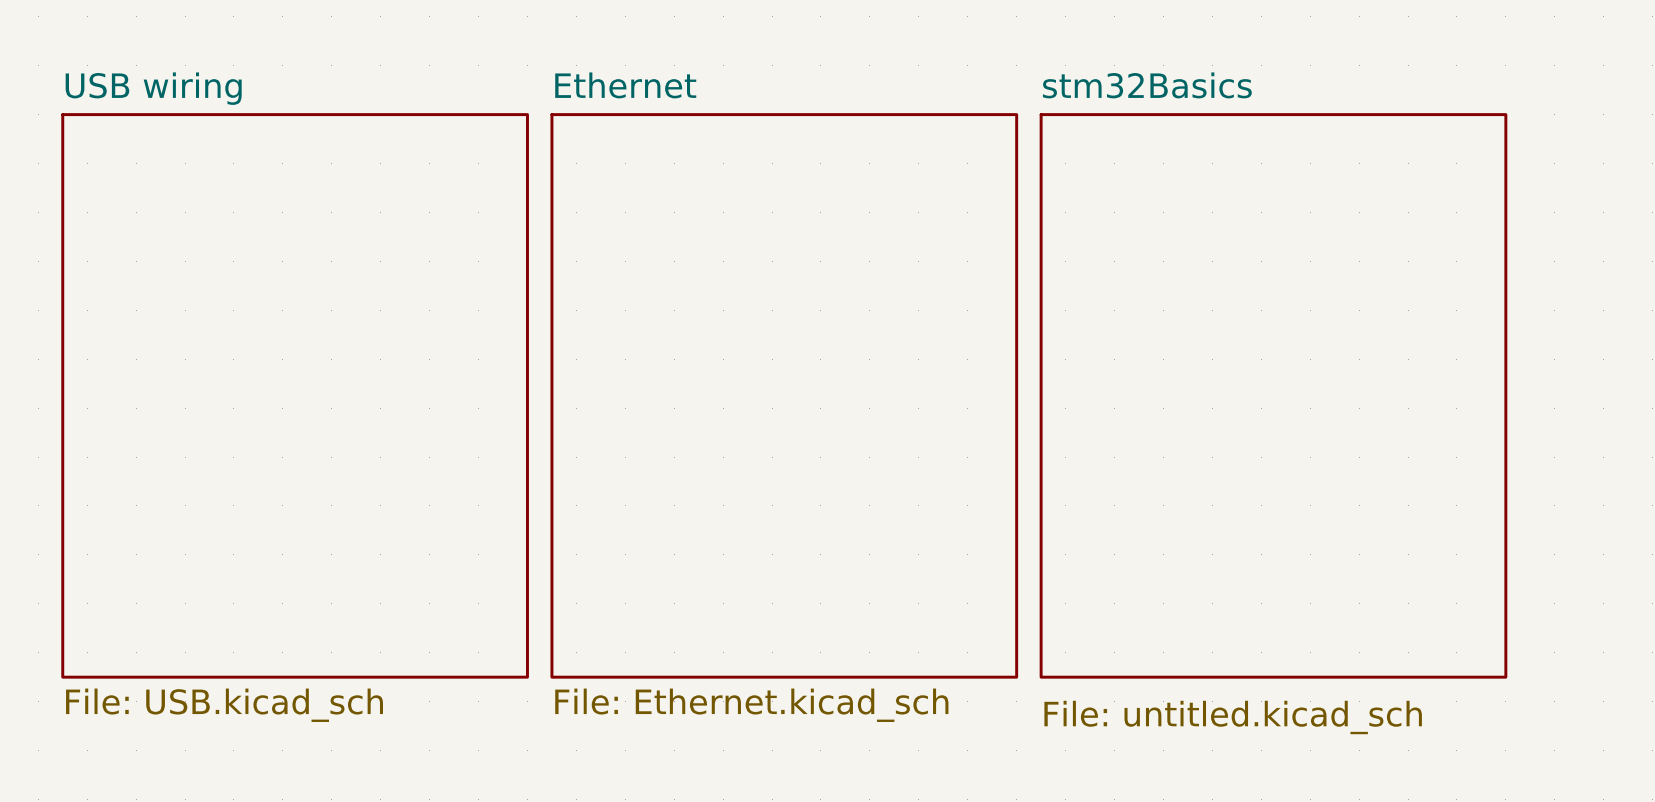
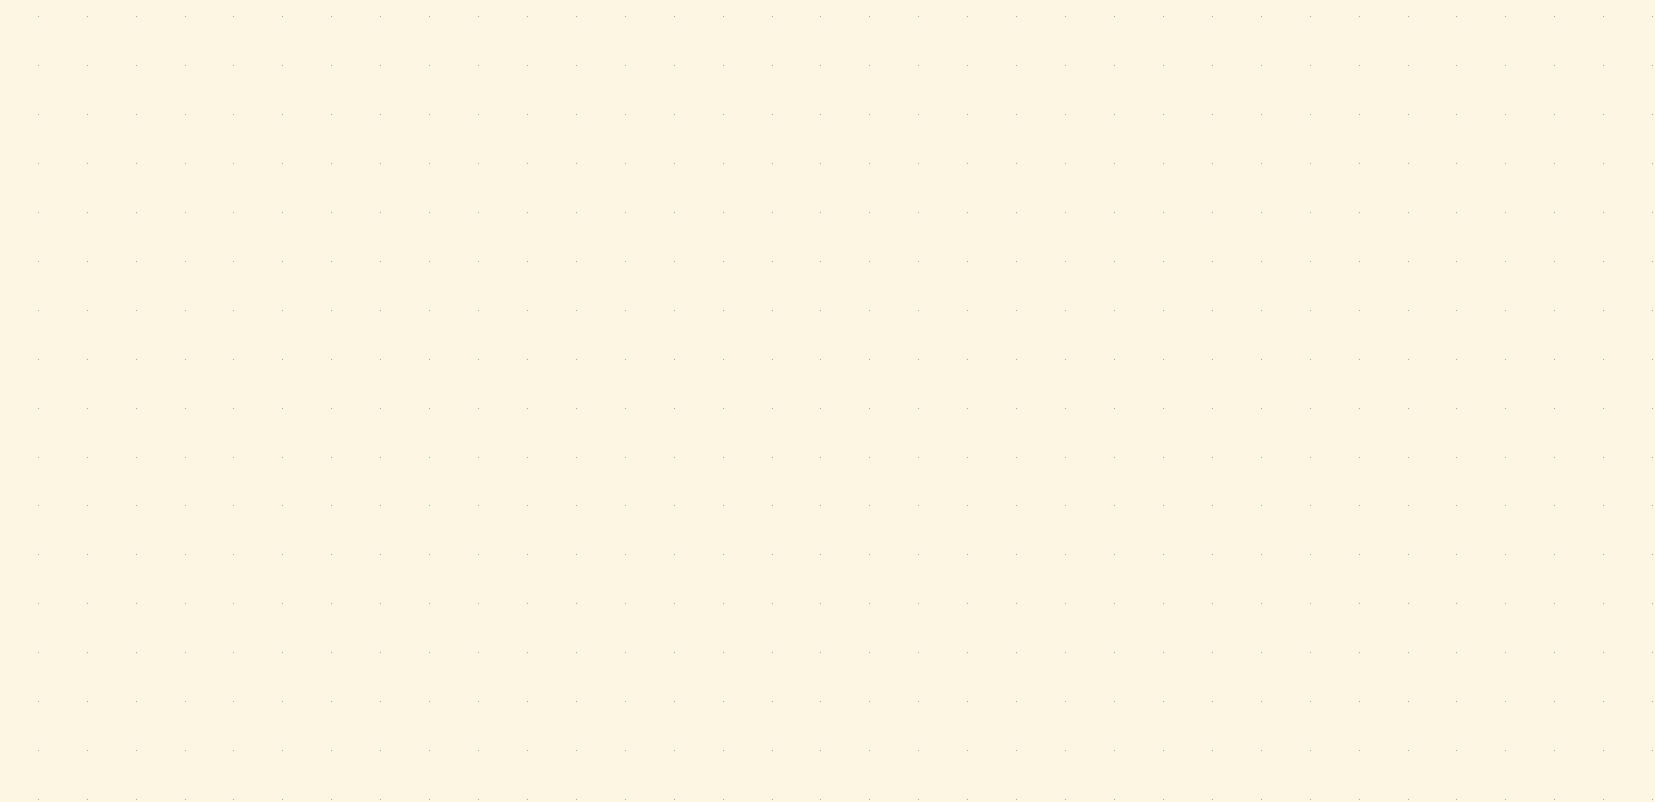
sheet USB wiring: File: USB.kicad_sch (295, 395) -> none
sheet Ethernet: File: Ethernet.kicad_sch (784, 395) -> none
sheet stm32Basics: File: untitled.kicad_sch (1273, 395) -> none

